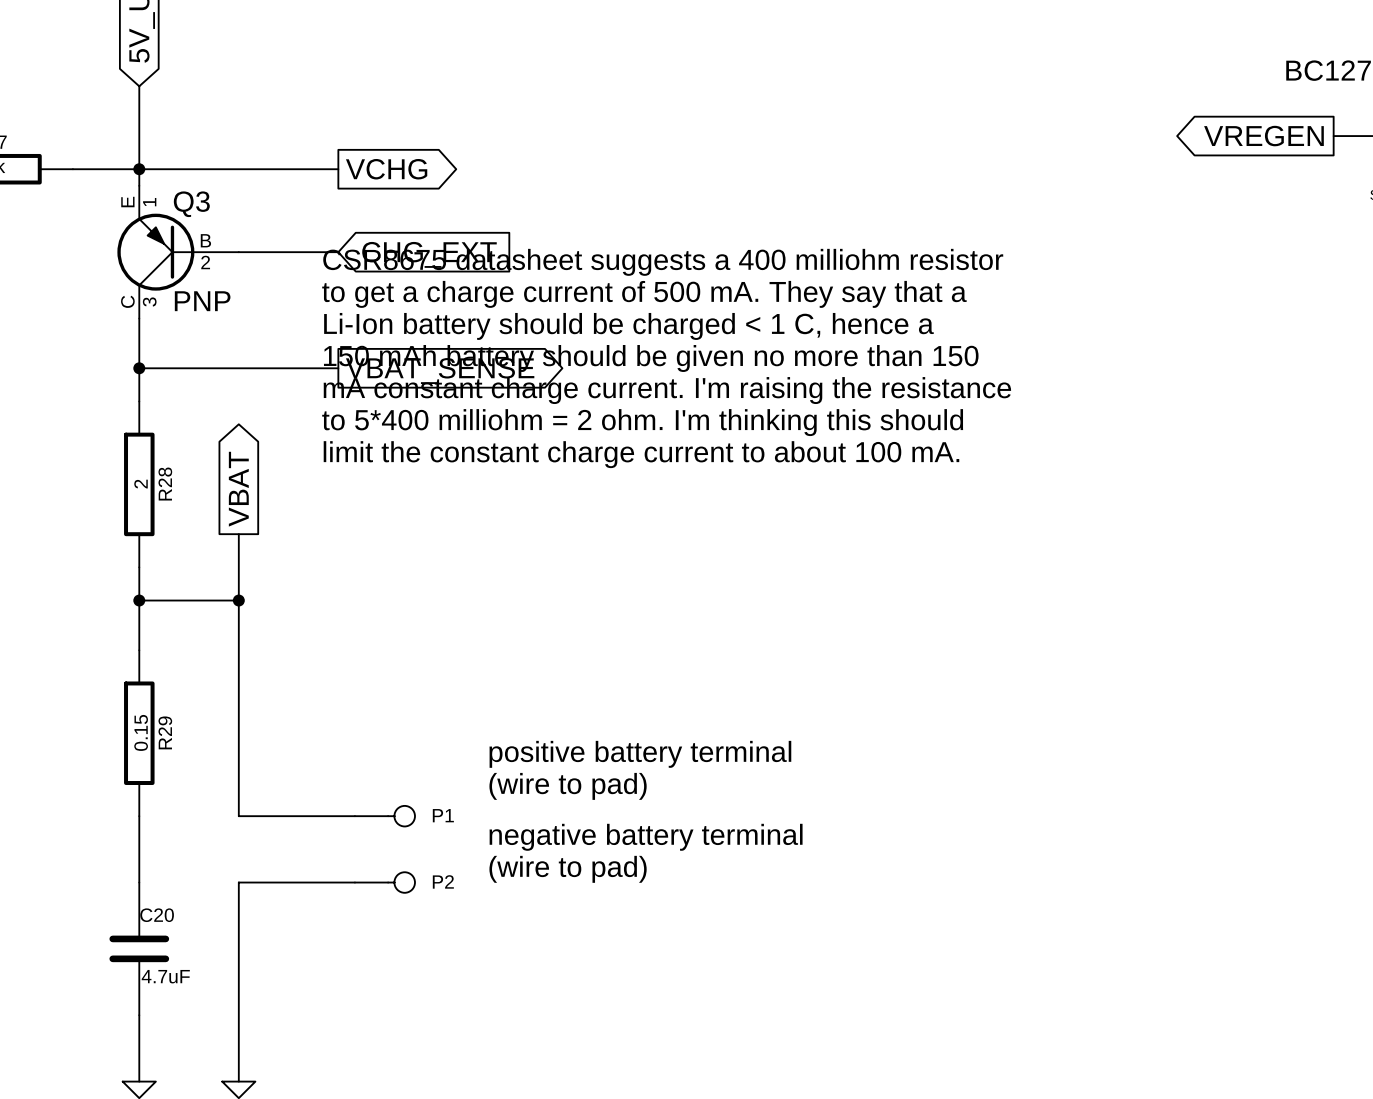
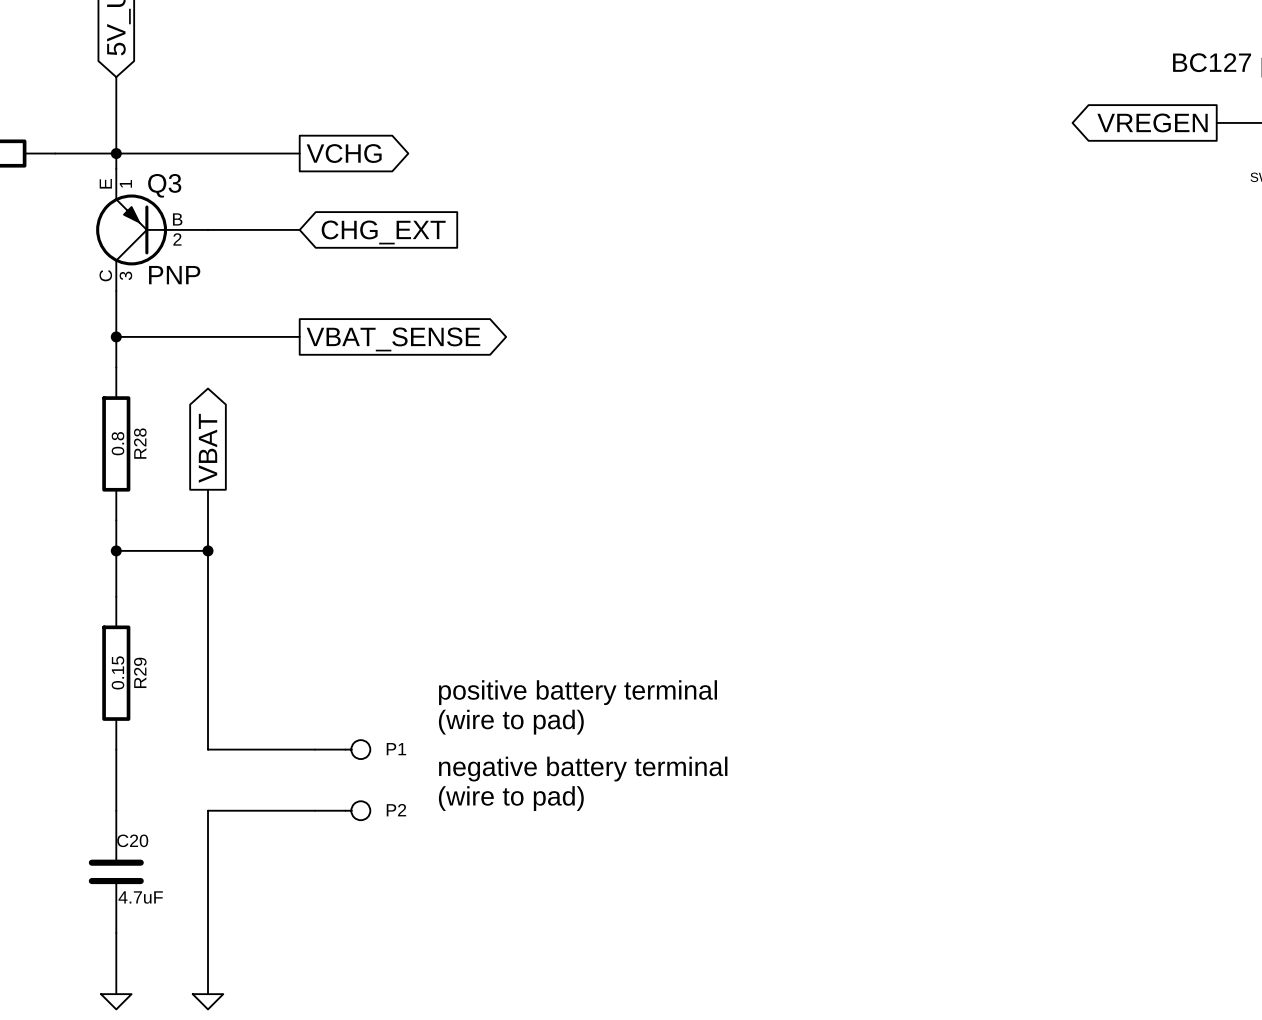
text: CSR8675 datasheet suggests a 400 milliohm resistor (663, 262) -> none
text: to get a charge current of 500 mA. They say that a (644, 294) -> none
text: Li-Ion battery should be charged < 1 C, hence a (628, 326) -> none
text: 150 mAh battery should be given no more than 150 (651, 358) -> none
text: mA constant charge current. I'm raising the resistance (667, 390) -> none
text: to 5*400 milliohm = 2 ohm. I'm thinking this should (642, 422) -> none
text: limit the constant charge current to about 100 mA. (641, 454) -> none
R28 value: 2 (141, 484) -> 0.8 (117, 443)

